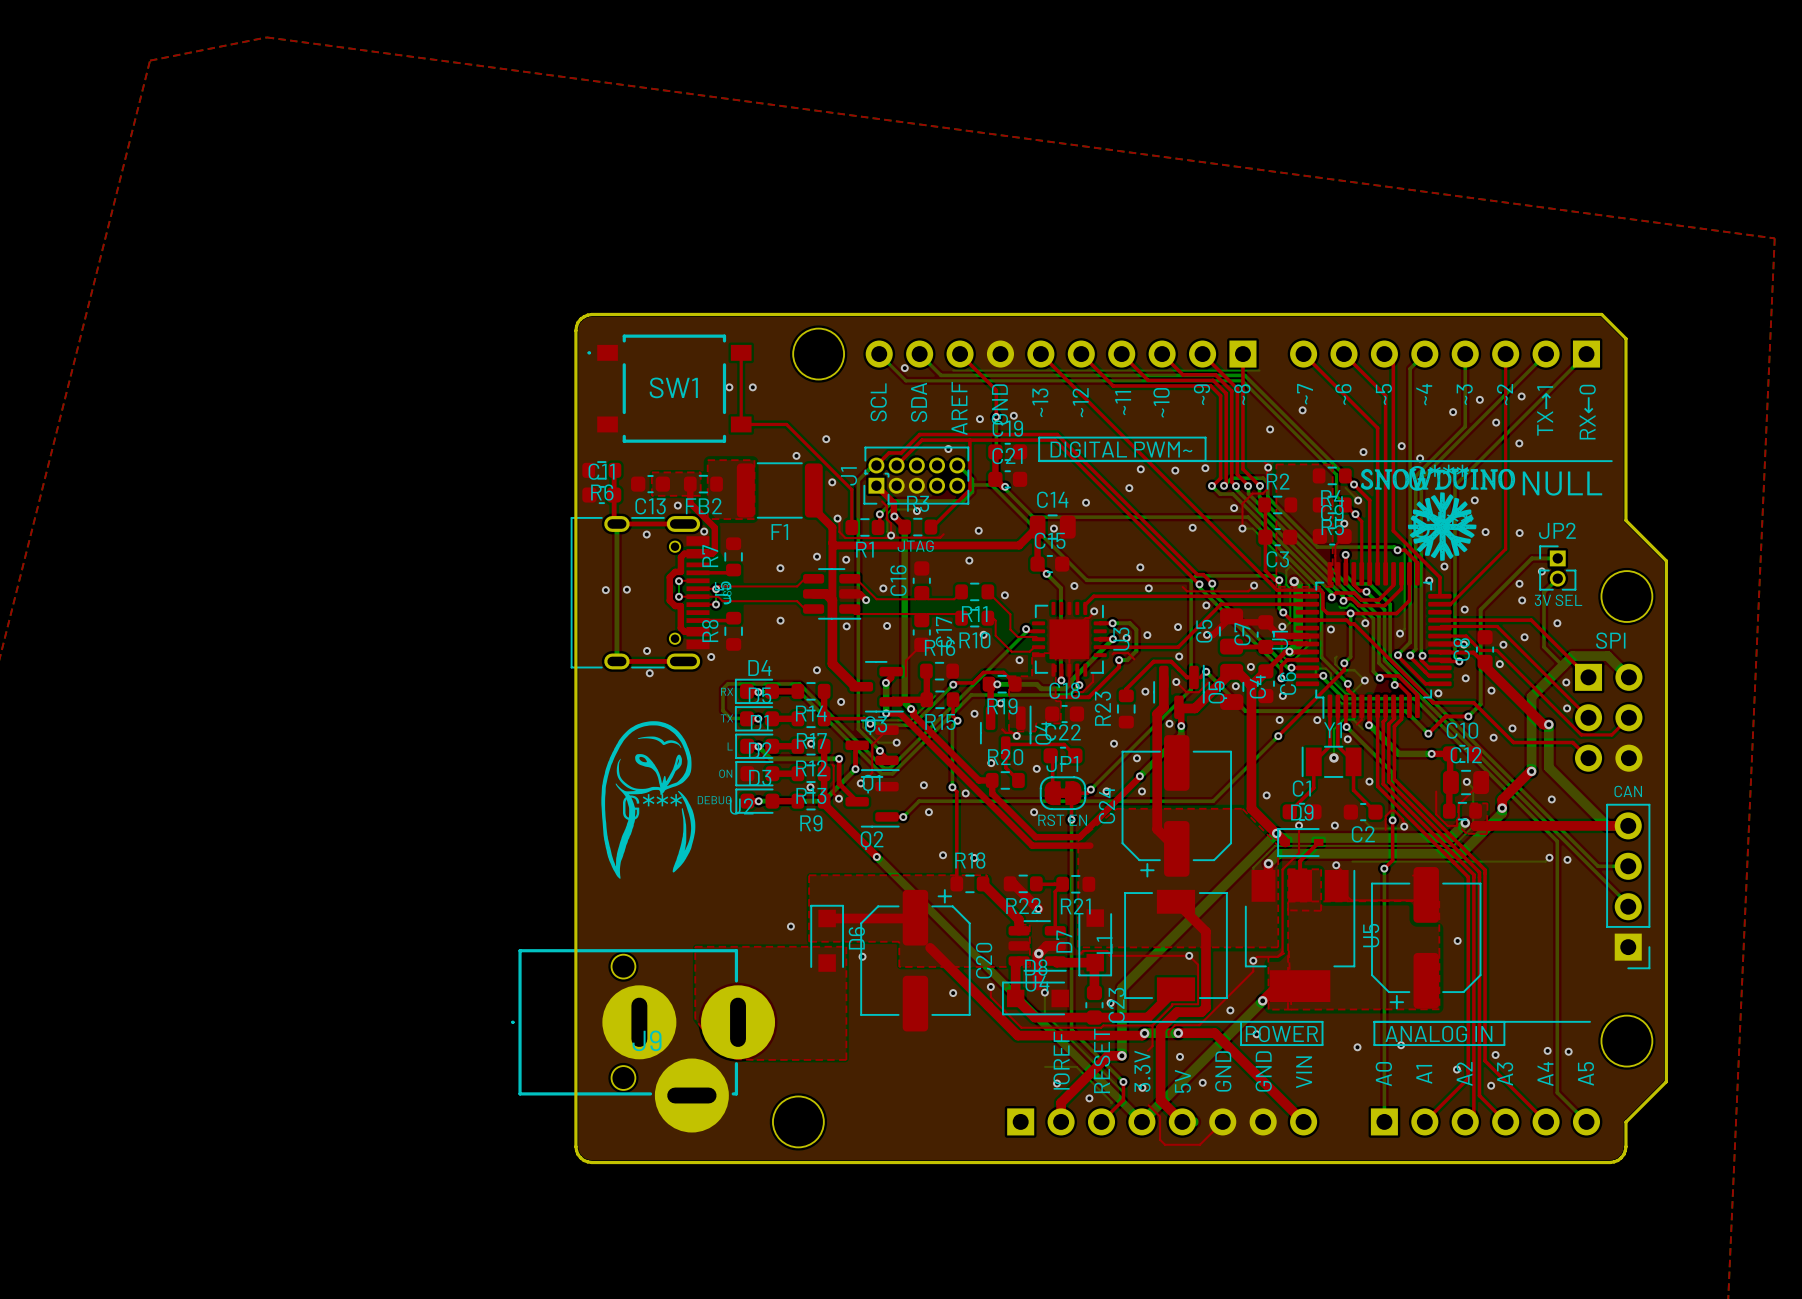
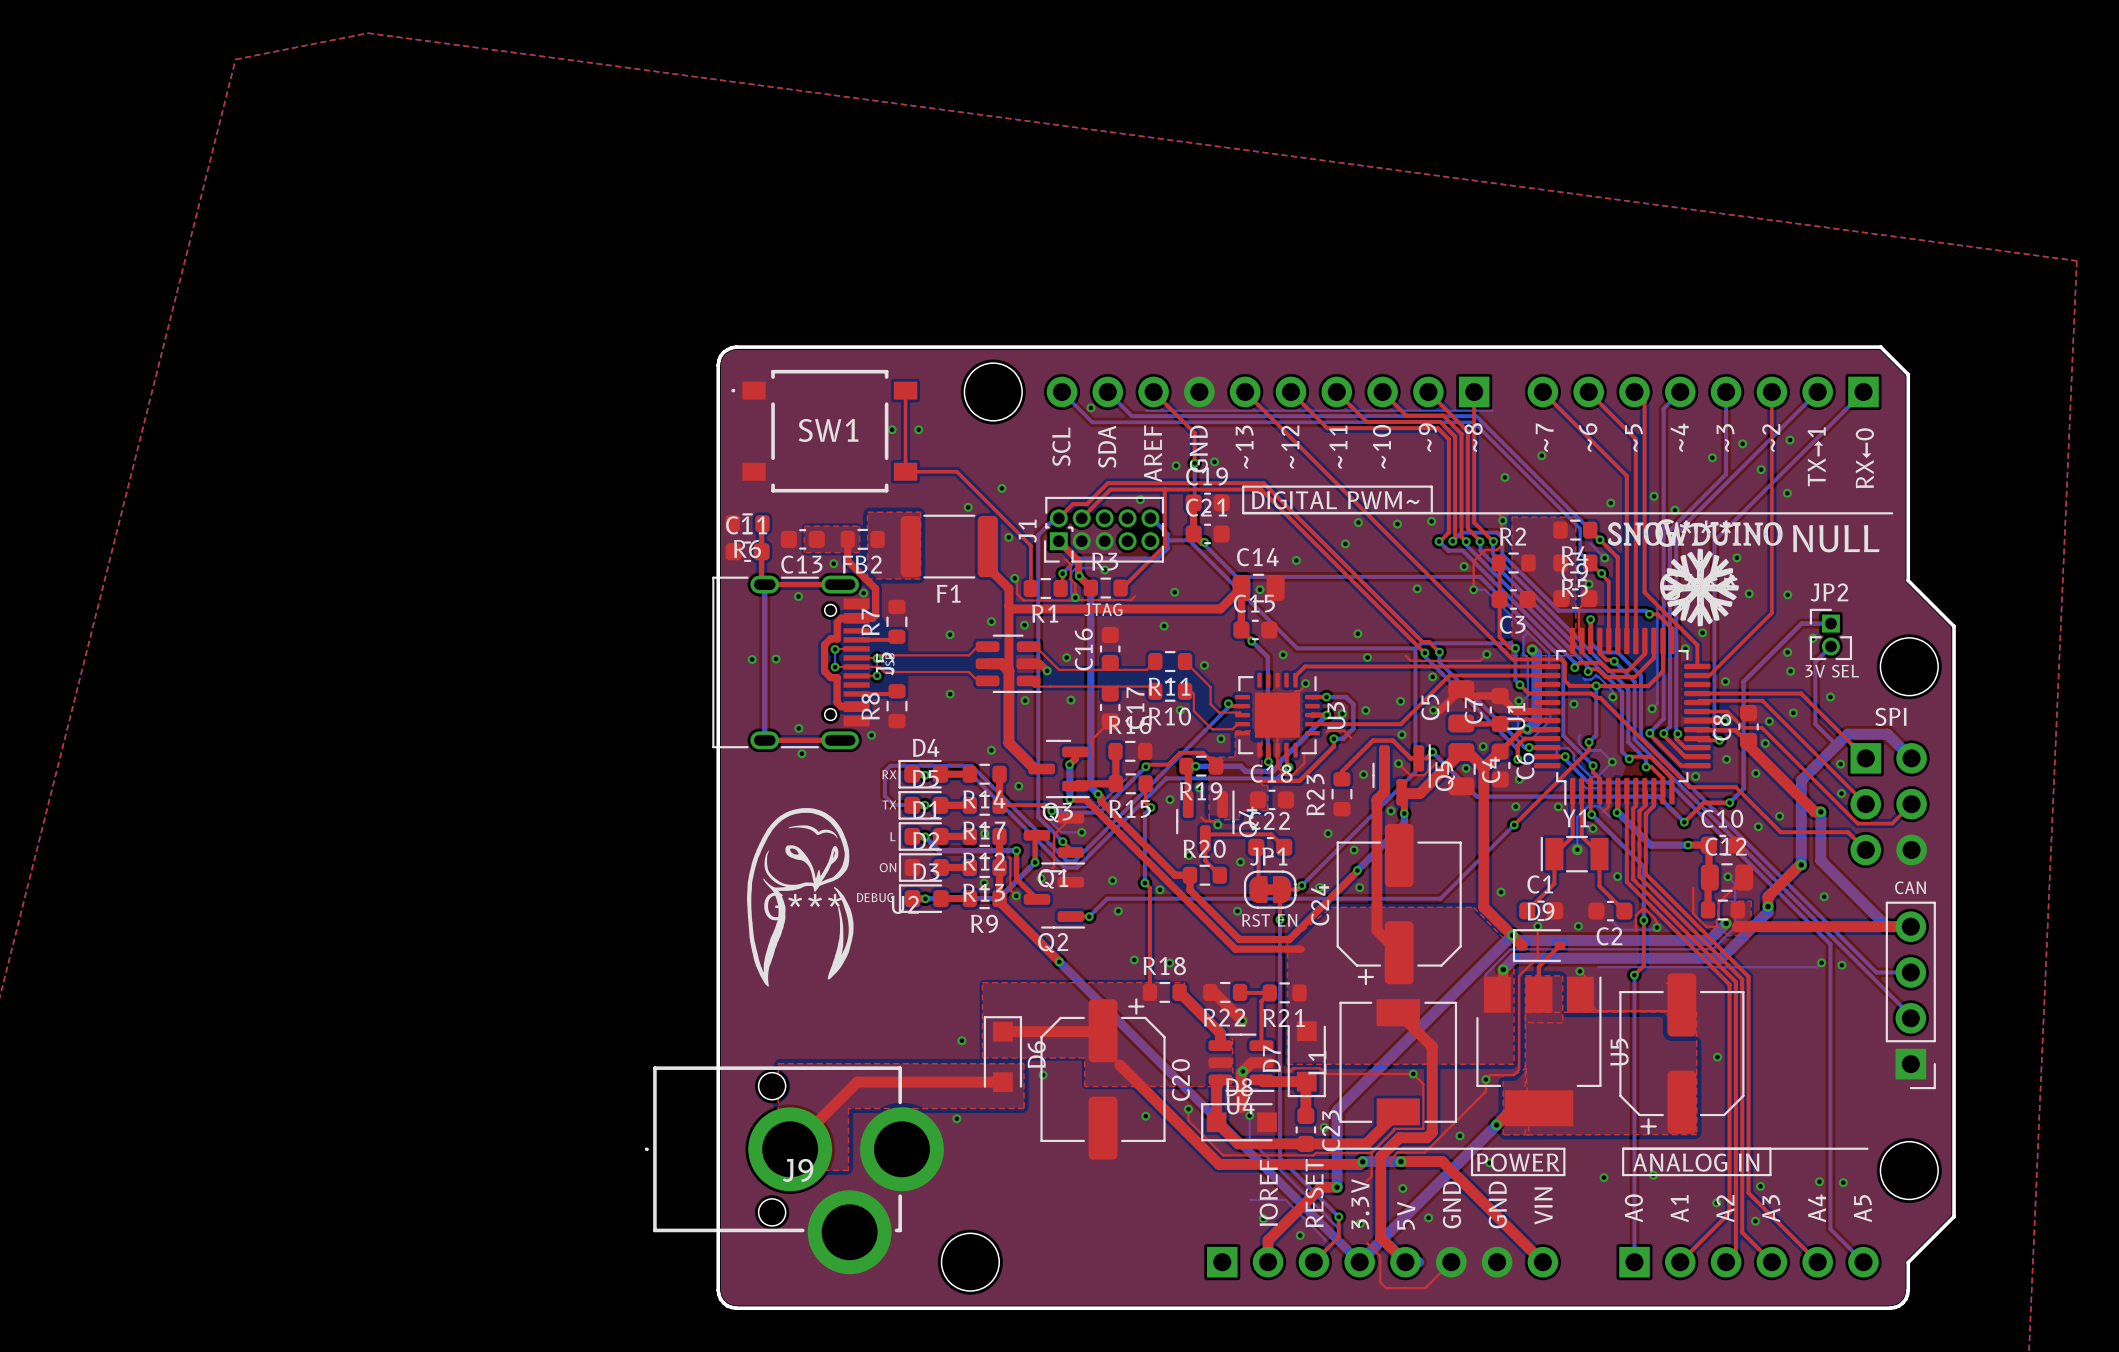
top zone outline: (695, 946) (695, 1018) (702, 1029) (735, 1059) (846, 1059) (846, 946) (695, 946) -> (778, 1063) (778, 1170) (848, 1170) (848, 1108) (1024, 1108) (1023, 1063) (778, 1063)
J9 footprint: [511, 949, 776, 1133] -> [645, 1066, 944, 1275]
top track: none -> (1002, 1082) (857, 1082) (790, 1149)
via: none -> (956, 1118)

